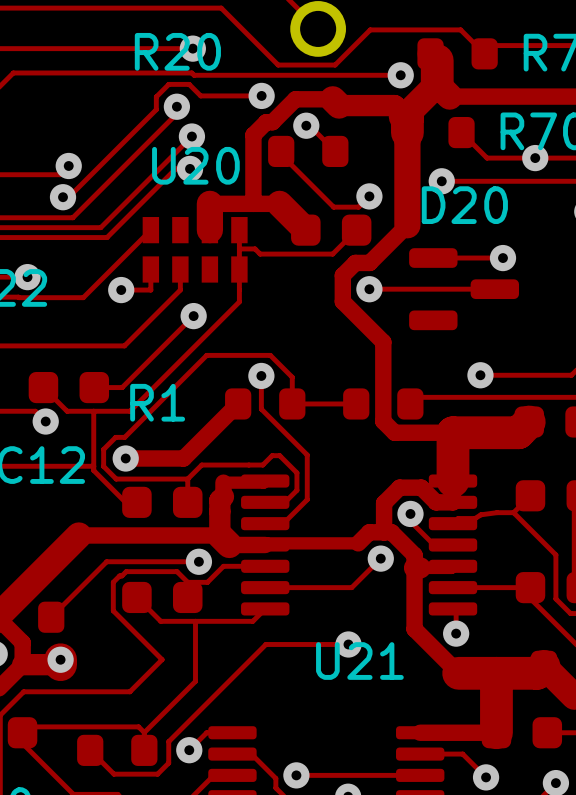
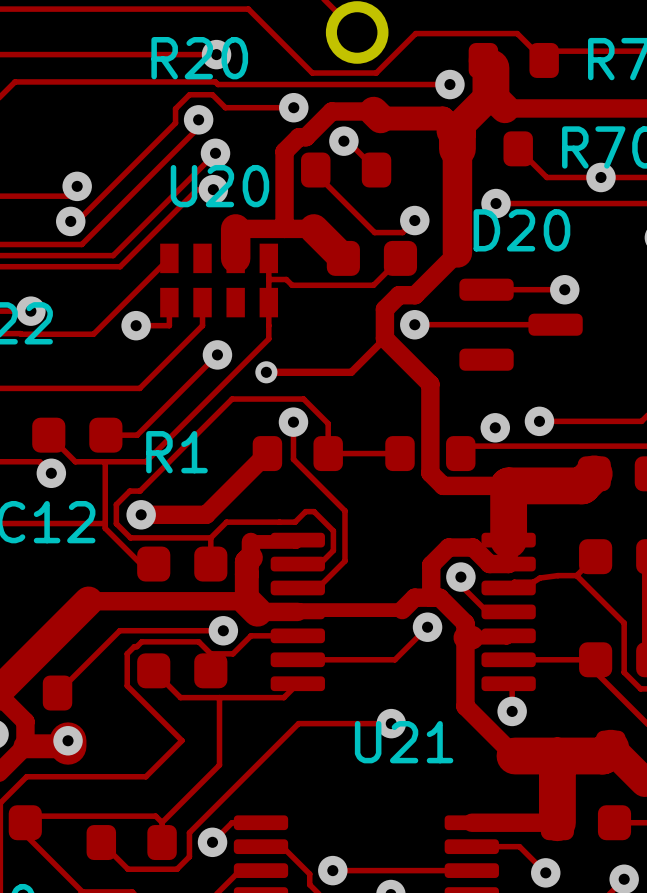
track: none -> (384, 338) (351, 372) (266, 372)
via: none -> (266, 372)
via: none -> (495, 427)

